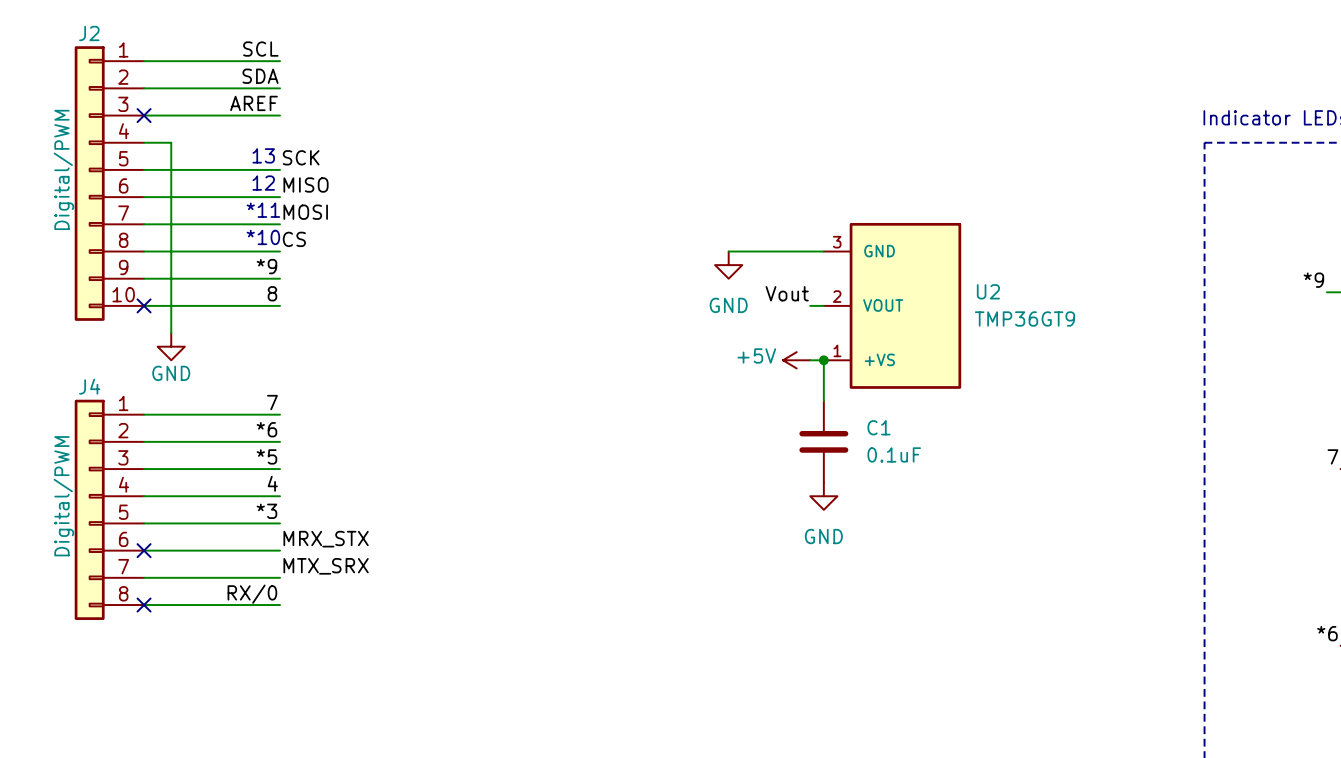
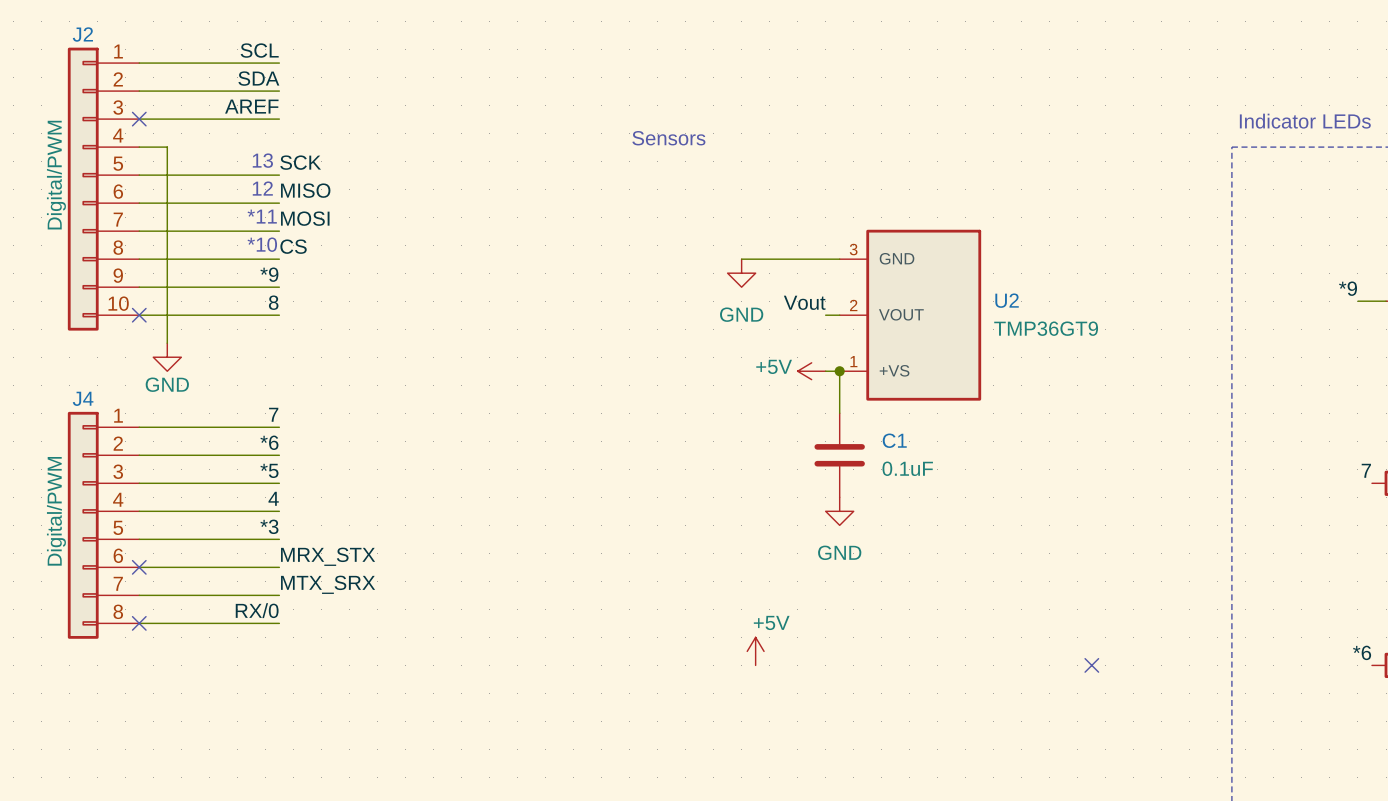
text: none -> Sensors (668, 138)
power symbol: none -> +5V (755, 651)
no-connect mark: none -> (1091, 665)

